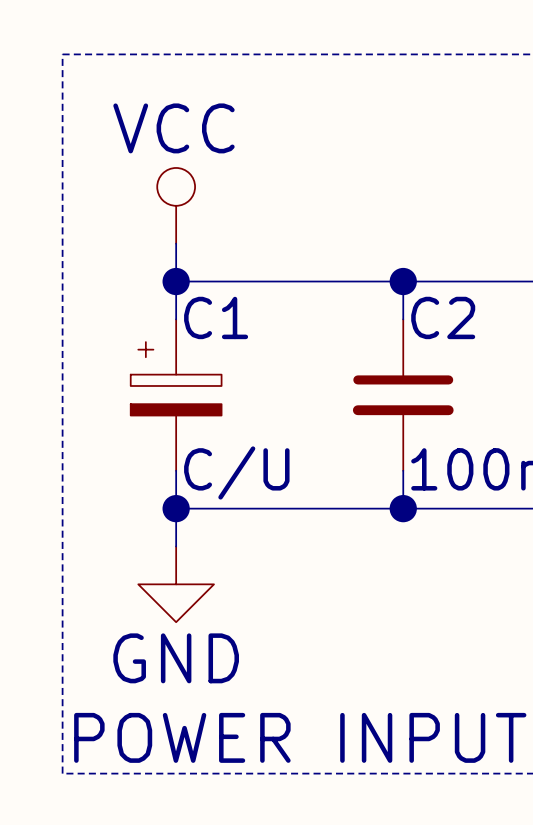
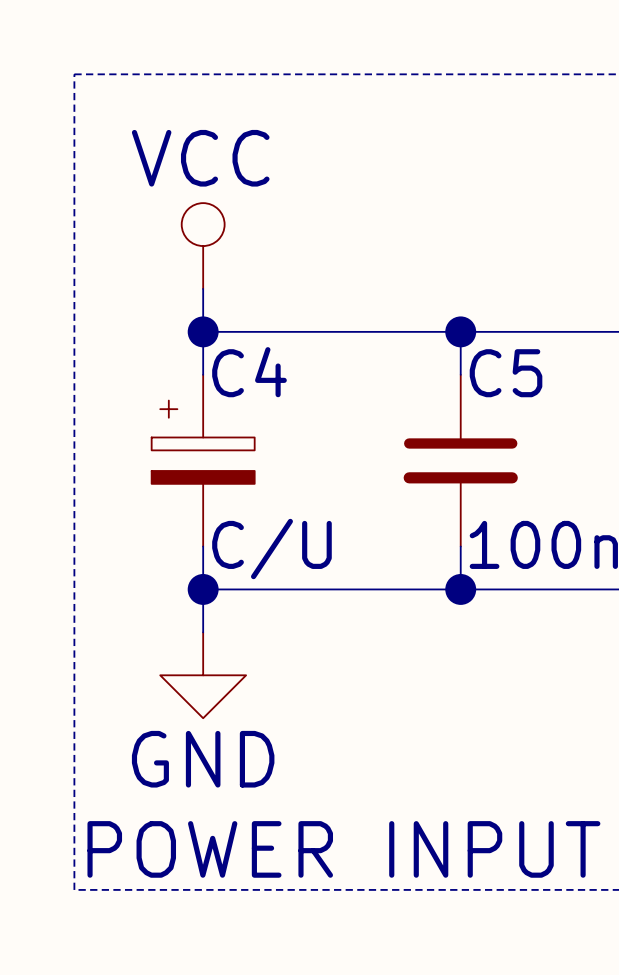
C1 name: C1 (216, 317) -> C4 (249, 372)
C2 name: C2 (443, 317) -> C5 (506, 373)

